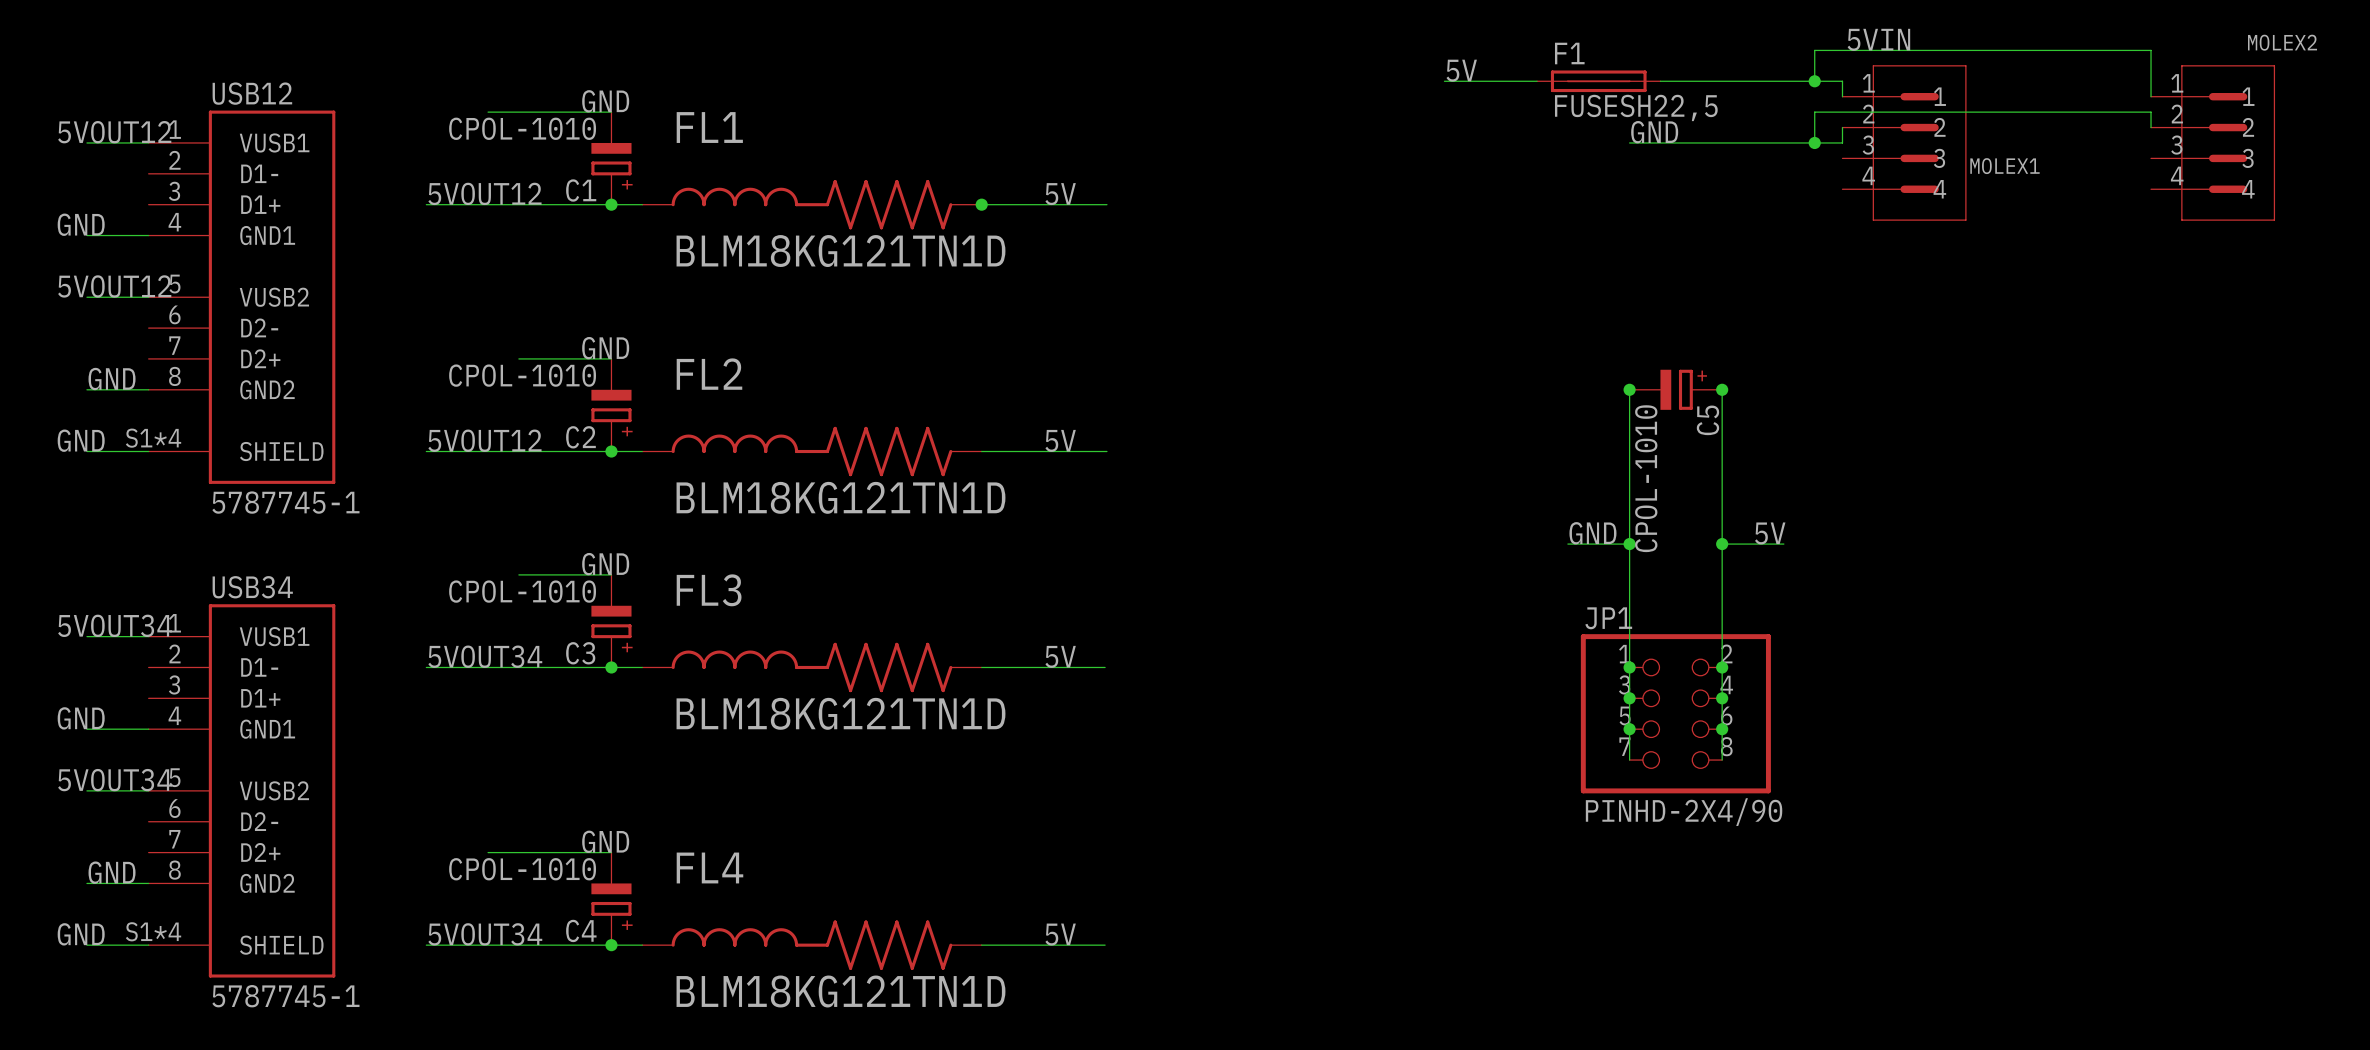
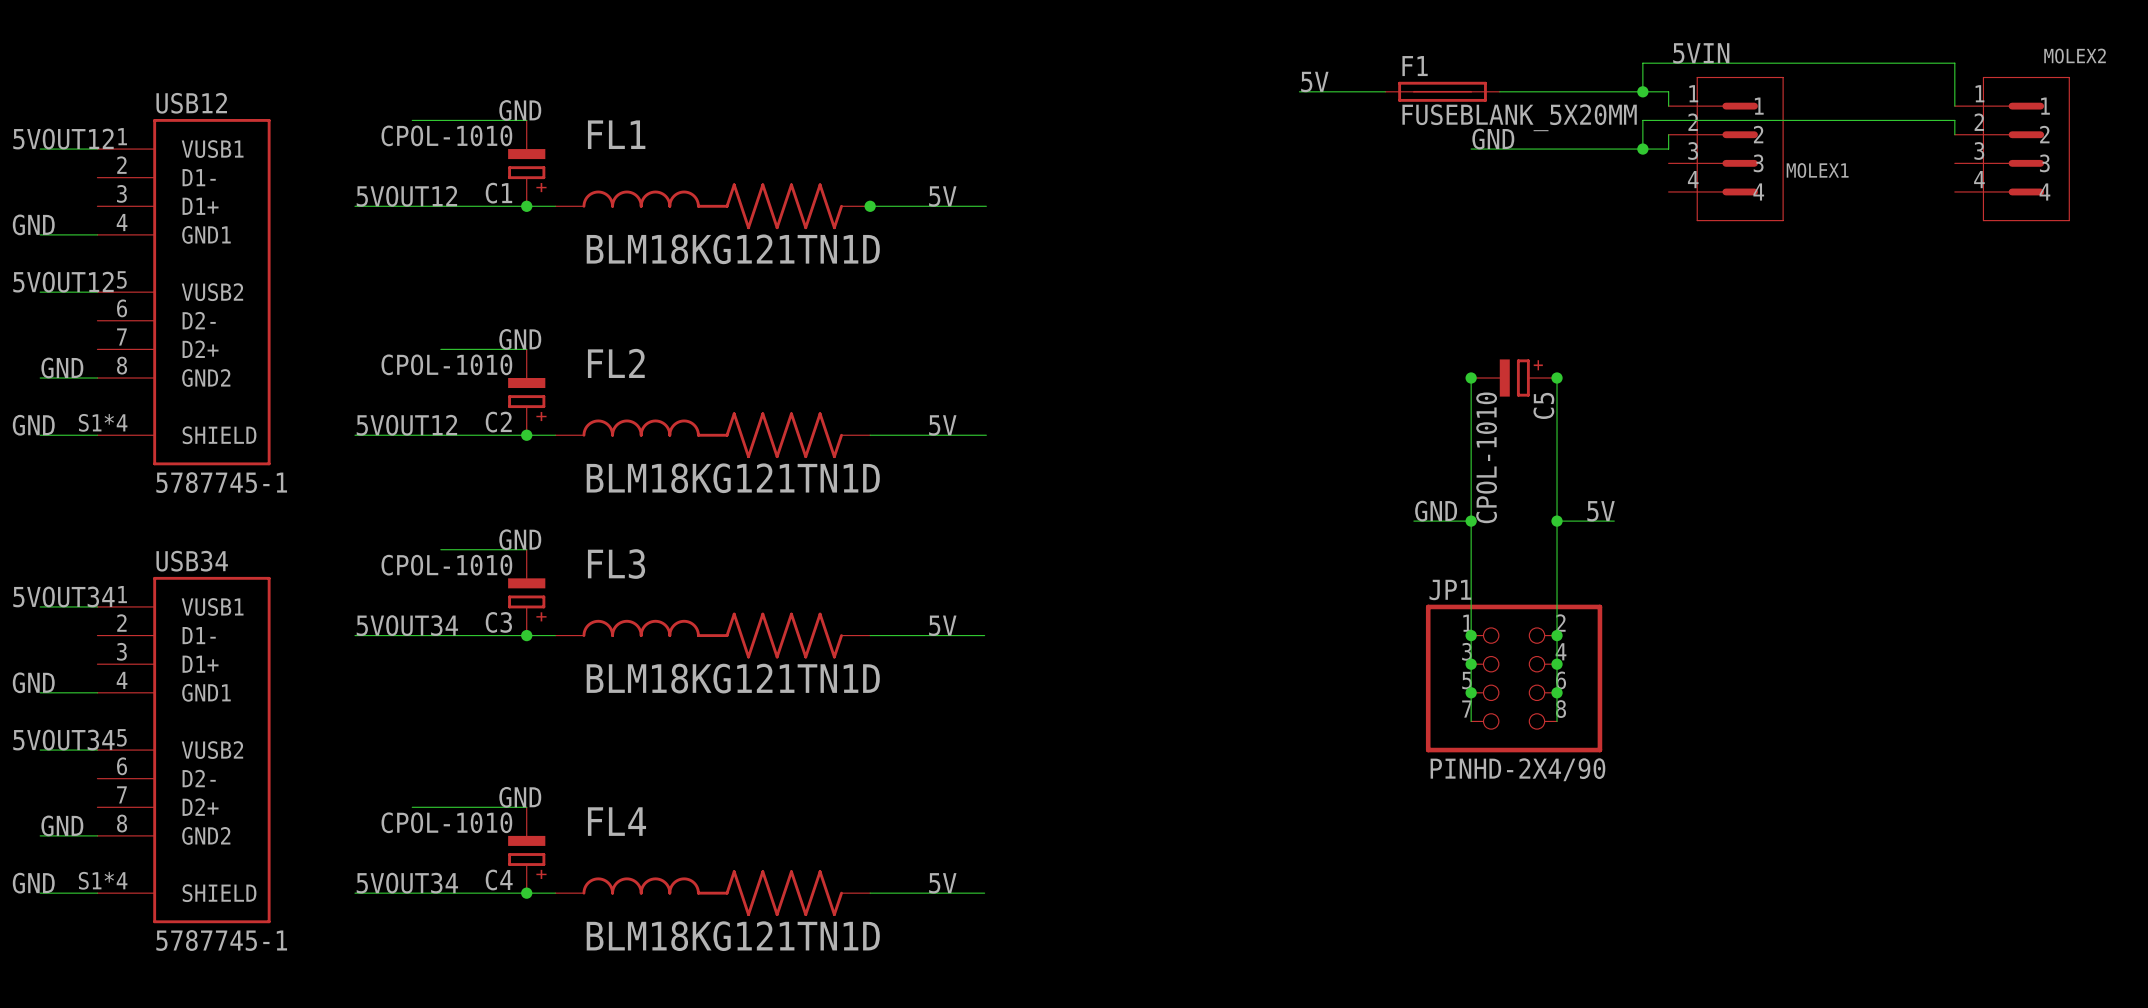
F1 value: FUSESH22,5 (1636, 107) -> FUSEBLANK_5X20MM (1519, 117)

